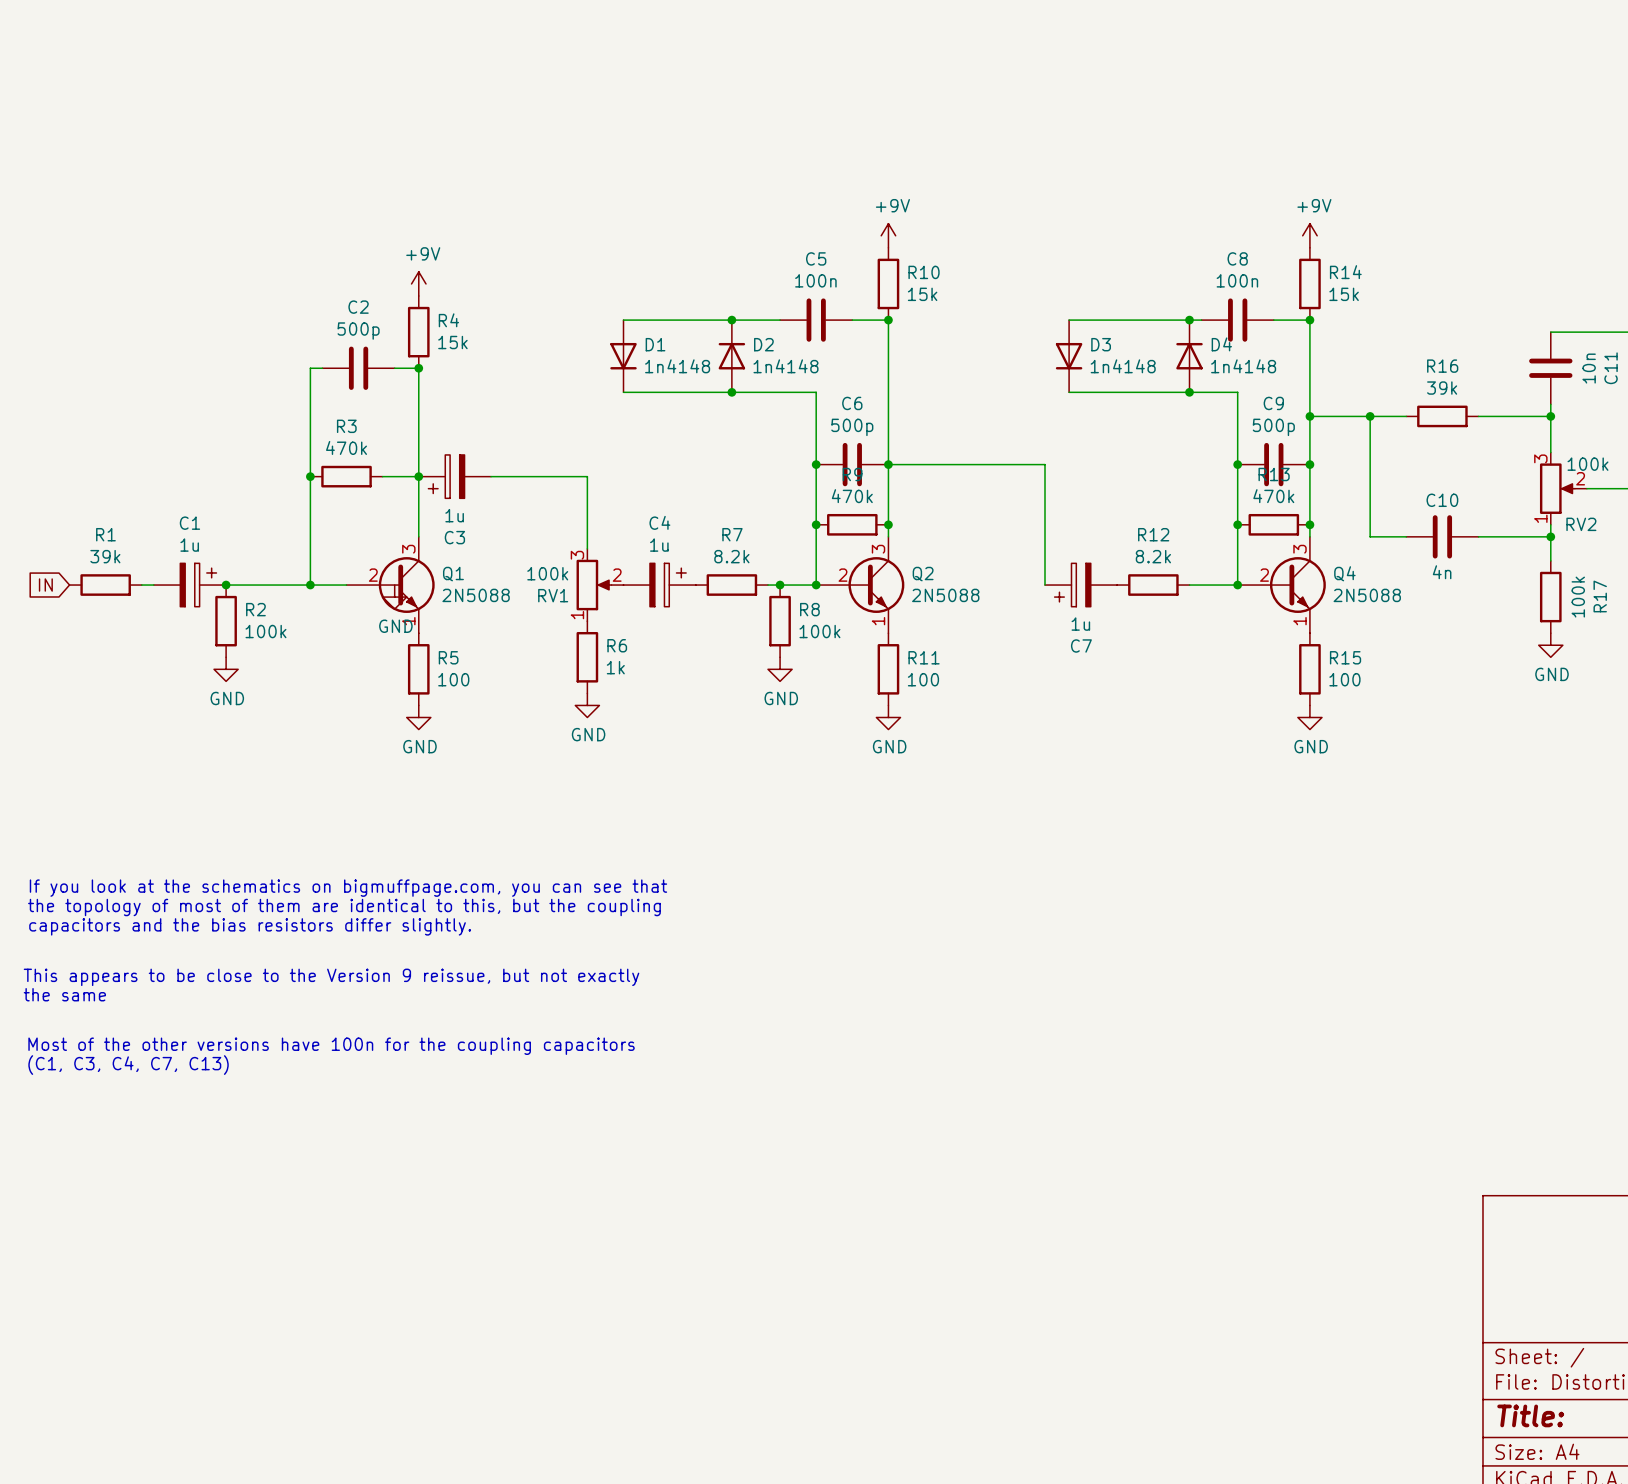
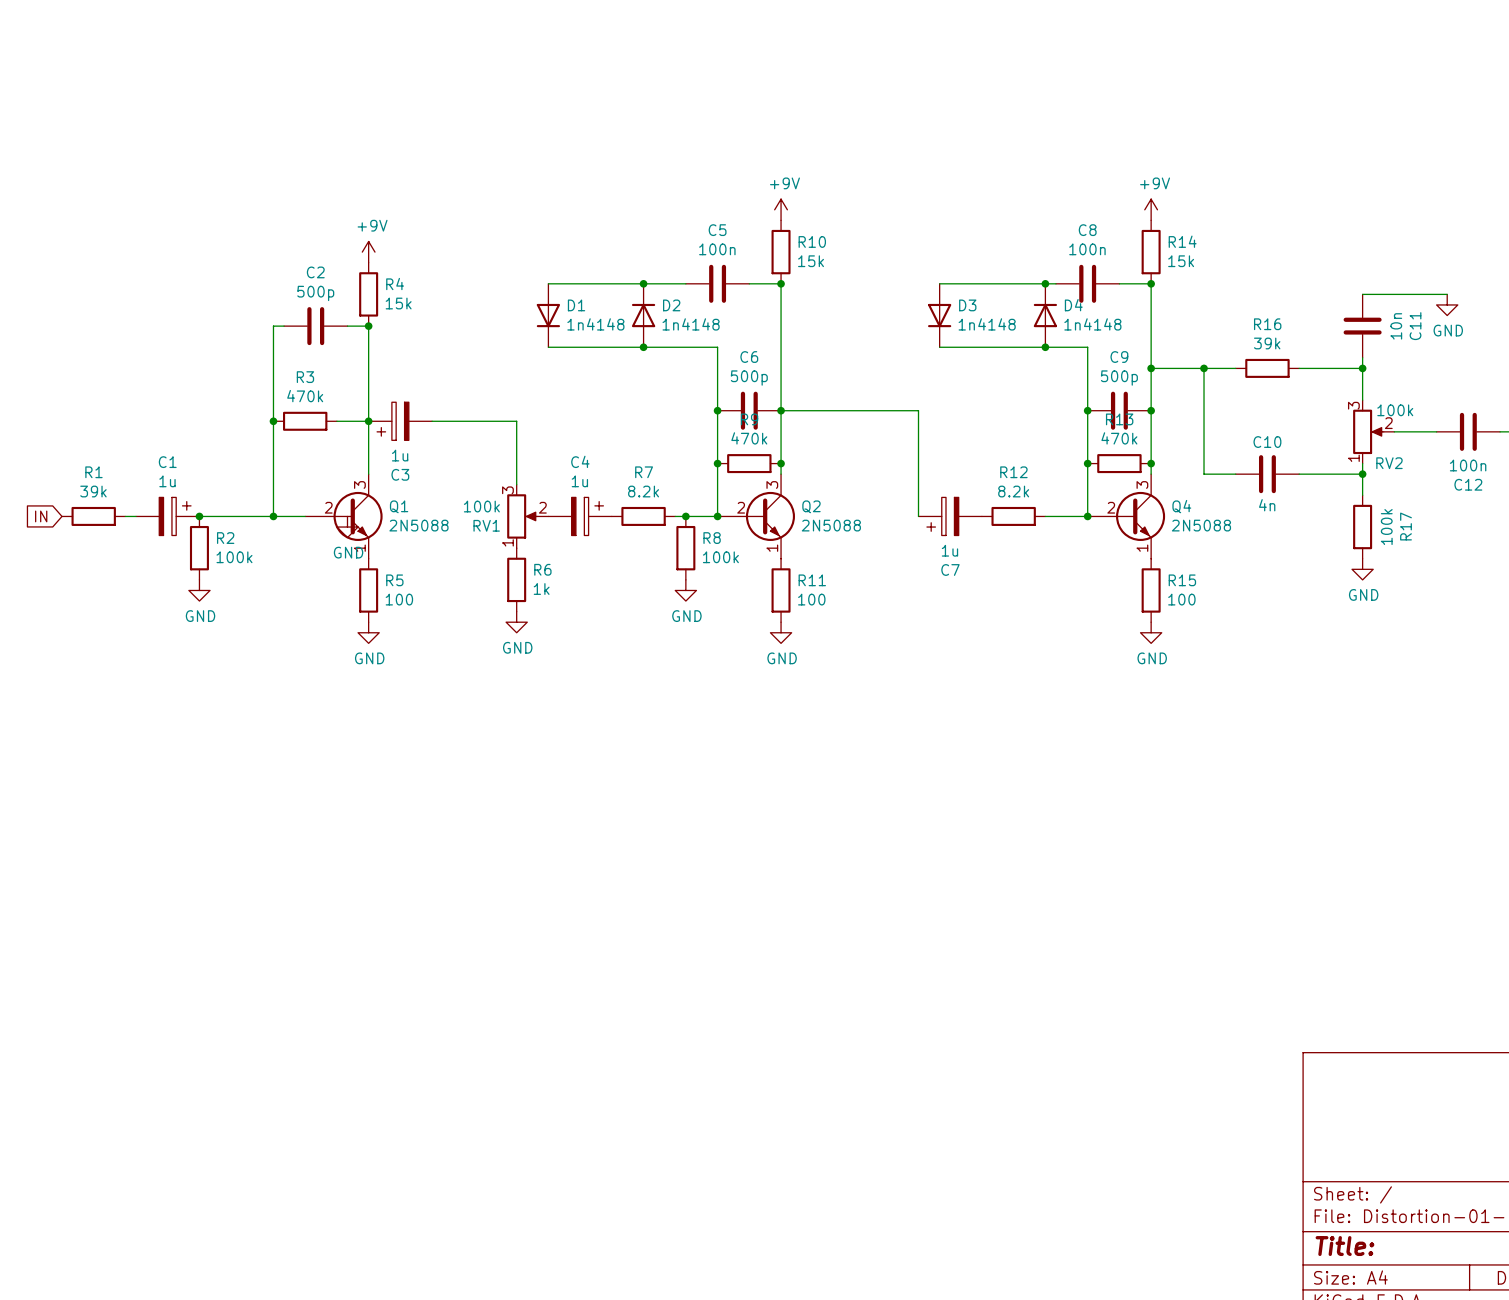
text: If you look at the schematics on bigmuffpage.com, you can see that (348, 888) -> none
text: the topology of most of them are identical to this, but the coupling (344, 907) -> none
text: capacitors and the bias resistors differ slightly. (250, 926) -> none
text: This appears to be close to the Version 9 reissue, but not exactly (331, 977) -> none
text: the same (64, 994) -> none
text: Most of the other versions have 100n for the coupling capacitors (331, 1046) -> none
text: (C1, C3, C4, C7, C13) (128, 1065) -> none

